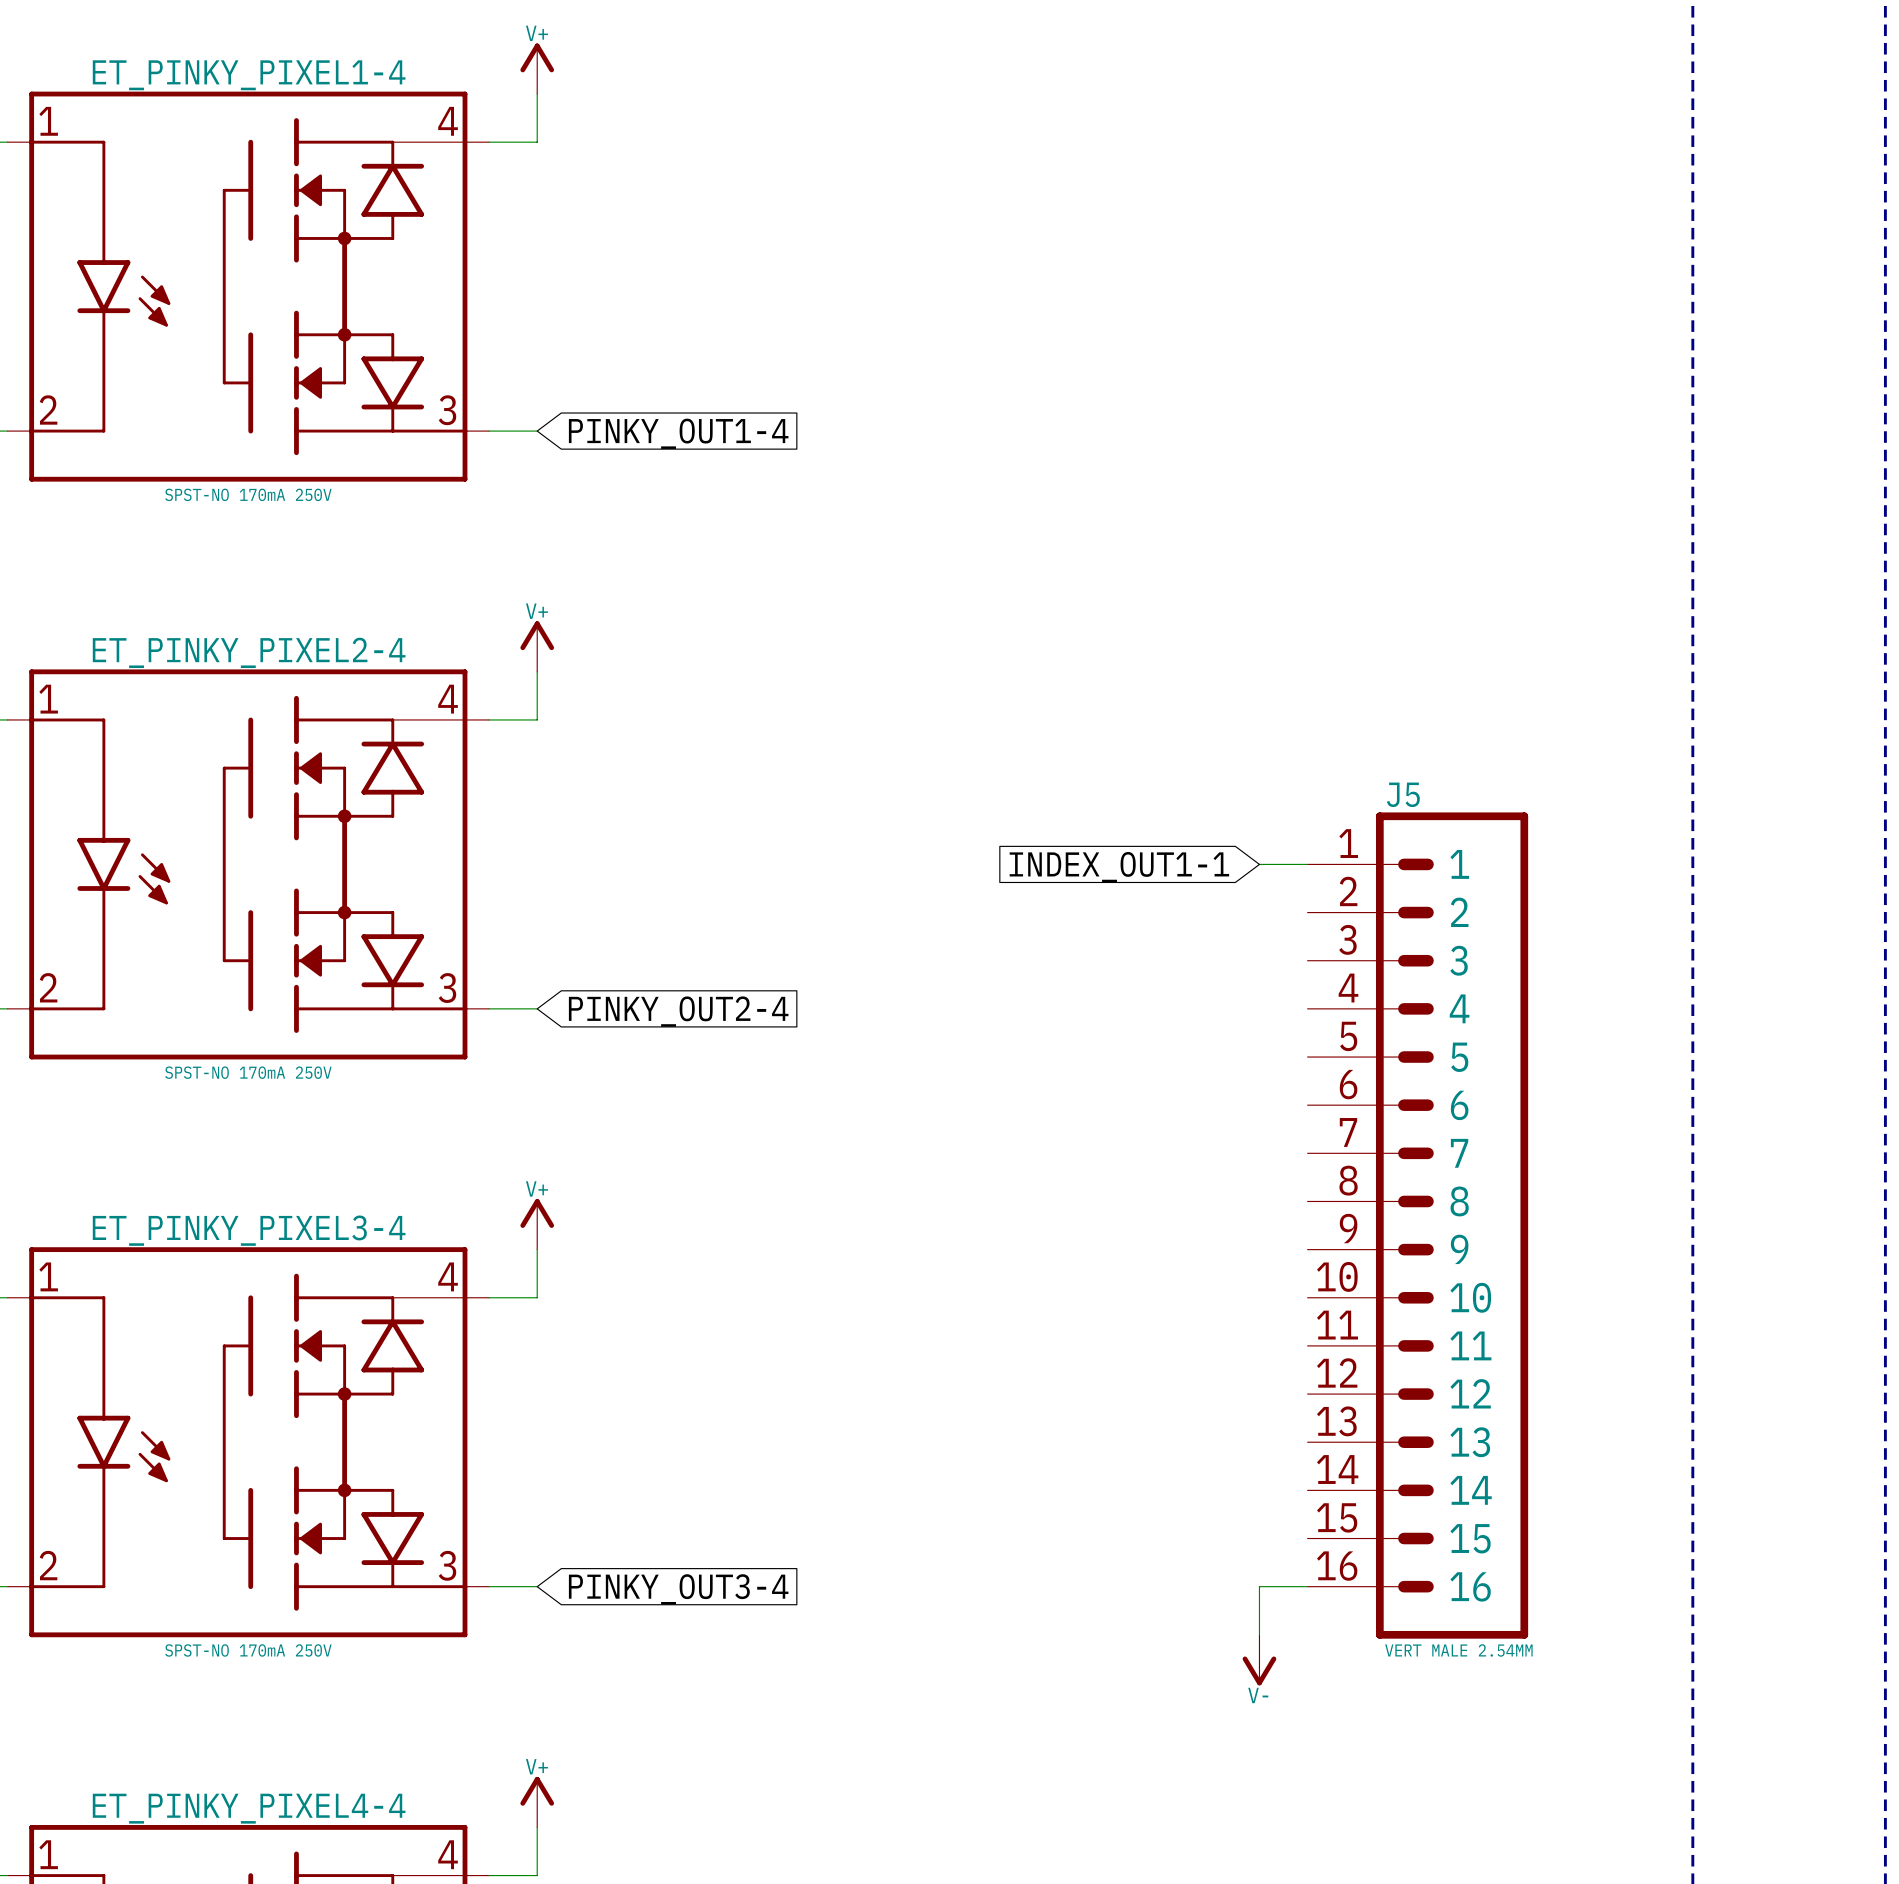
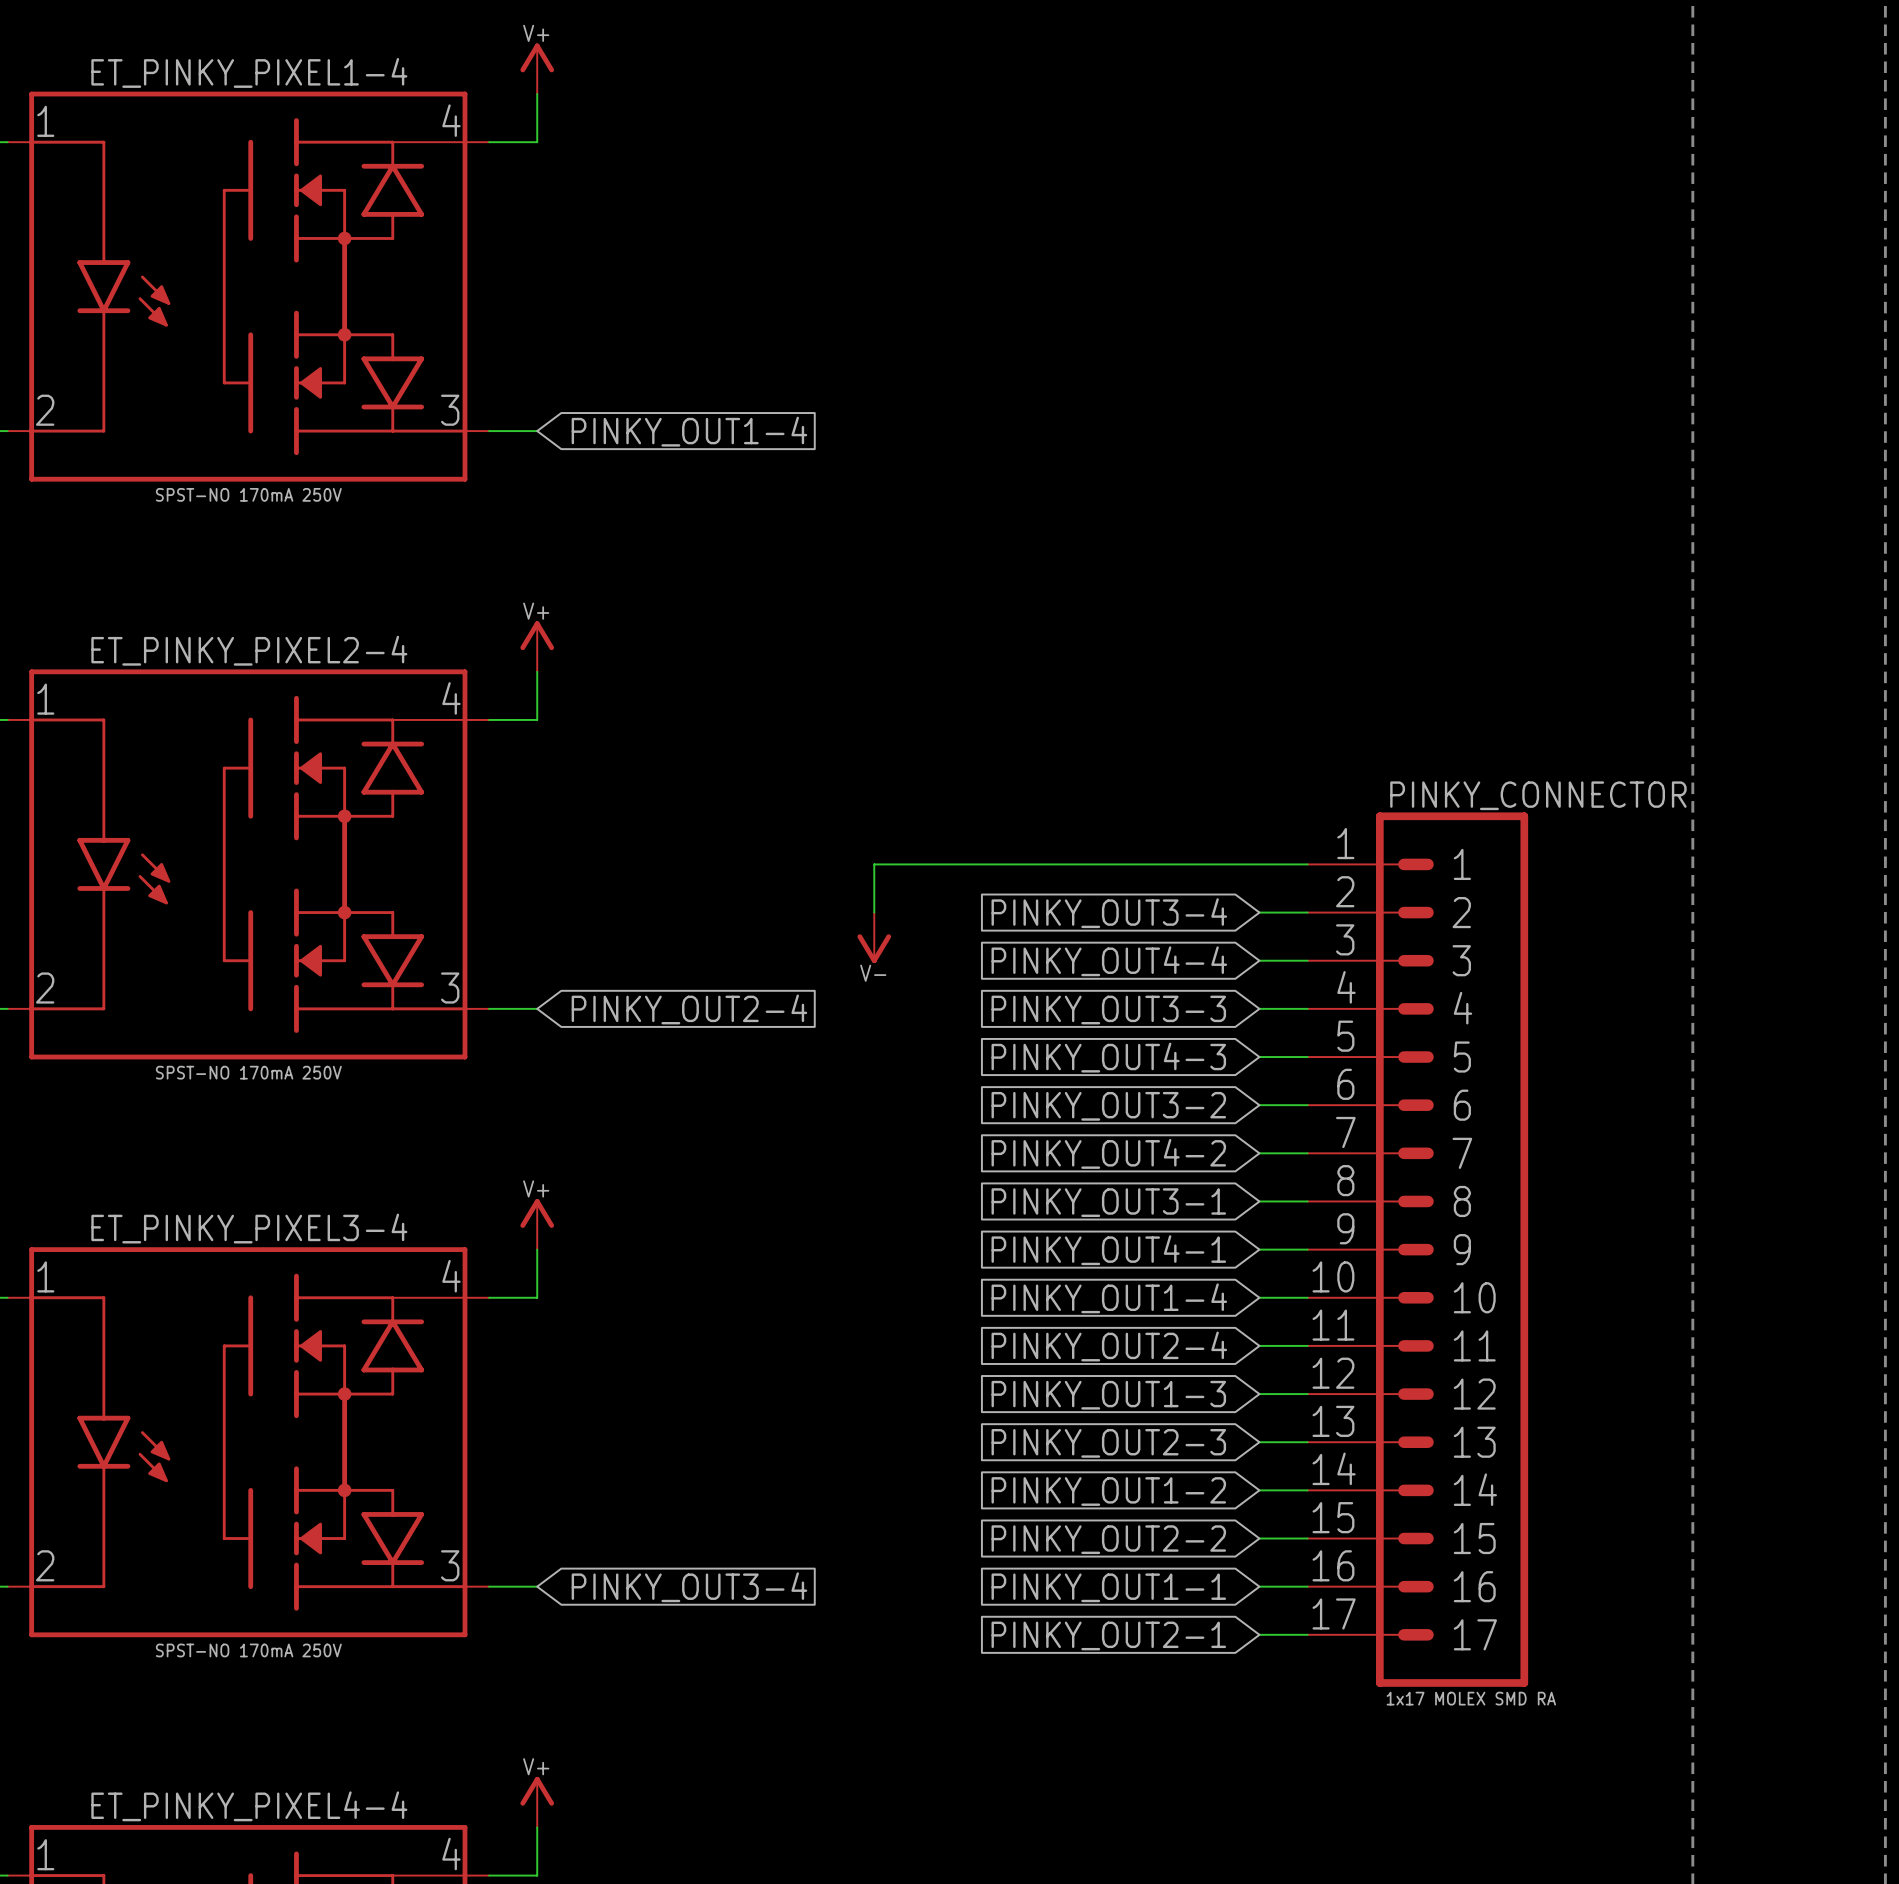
wire: none -> (1259, 864) (874, 864) (874, 912)
global label: INDEX_OUT1-1 (1119, 867) -> none
wire: none -> (1259, 912) (1307, 912)
global label: none -> PINKY_OUT3-4 (1109, 913)
power symbol: none -> (874, 937)
wire: none -> (1259, 960) (1307, 960)
global label: none -> PINKY_OUT4-4 (1109, 961)
wire: none -> (1259, 1008) (1307, 1008)
global label: none -> PINKY_OUT3-3 (1108, 1010)
wire: none -> (1259, 1057) (1307, 1057)
global label: none -> PINKY_OUT4-3 (1108, 1057)
wire: none -> (1259, 1105) (1307, 1105)
global label: none -> PINKY_OUT3-2 (1108, 1106)
wire: none -> (1259, 1153) (1307, 1153)
global label: none -> PINKY_OUT4-2 (1108, 1153)
wire: none -> (1259, 1201) (1307, 1201)
global label: none -> PINKY_OUT3-1 (1108, 1202)
J5: VERT MALE 2.54MM (1417, 1225) -> none
wire: none -> (1259, 1249) (1307, 1249)
PINKY_CONNECTOR: none -> 1x17 MOLEX SMD RA (1417, 1249)
global label: none -> PINKY_OUT4-1 (1108, 1250)
wire: none -> (1259, 1297) (1307, 1297)
global label: none -> PINKY_OUT1-4 (1109, 1298)
wire: none -> (1259, 1345) (1307, 1345)
global label: none -> PINKY_OUT2-4 (1109, 1346)
wire: none -> (1259, 1394) (1307, 1394)
global label: none -> PINKY_OUT1-3 (1108, 1395)
wire: none -> (1259, 1442) (1307, 1442)
global label: none -> PINKY_OUT2-3 (1108, 1443)
wire: none -> (1259, 1490) (1307, 1490)
global label: none -> PINKY_OUT1-2 (1108, 1491)
wire: none -> (1259, 1538) (1307, 1538)
global label: none -> PINKY_OUT2-2 (1108, 1539)
wire: (1259, 1586) (1259, 1634) -> (1307, 1634) (1259, 1634)
global label: none -> PINKY_OUT1-1 (1108, 1587)
global label: none -> PINKY_OUT2-1 (1108, 1635)
power symbol: (1259, 1660) -> none

